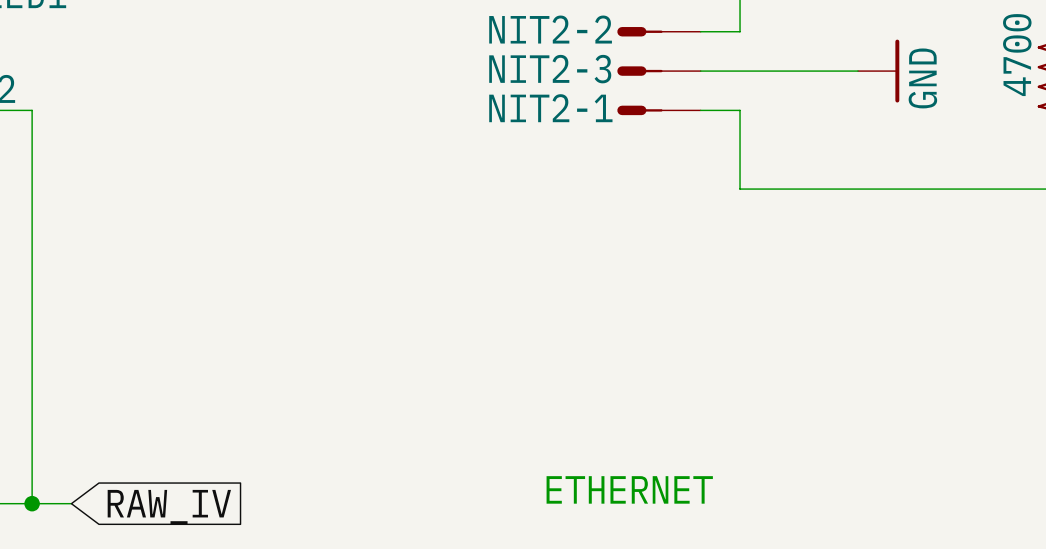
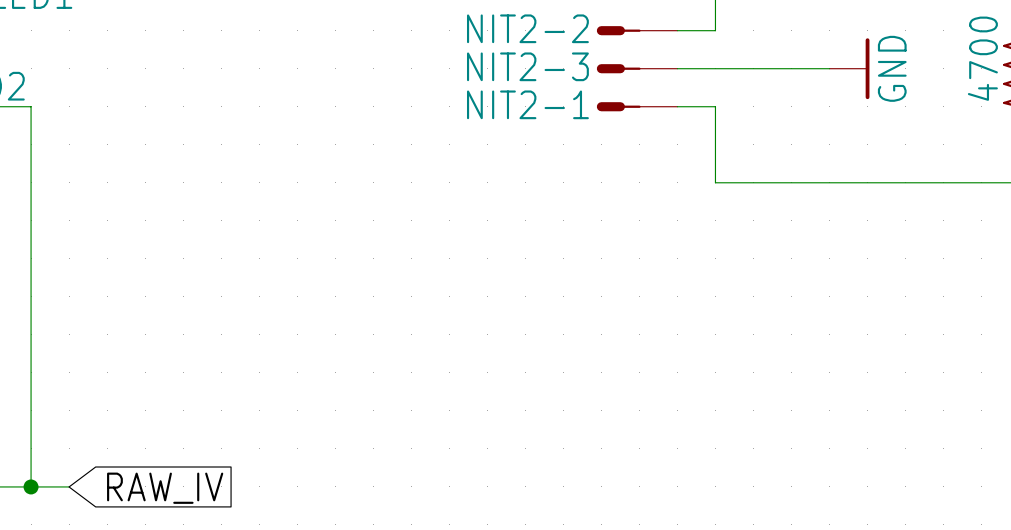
text: ETHERNET (629, 489) -> none

